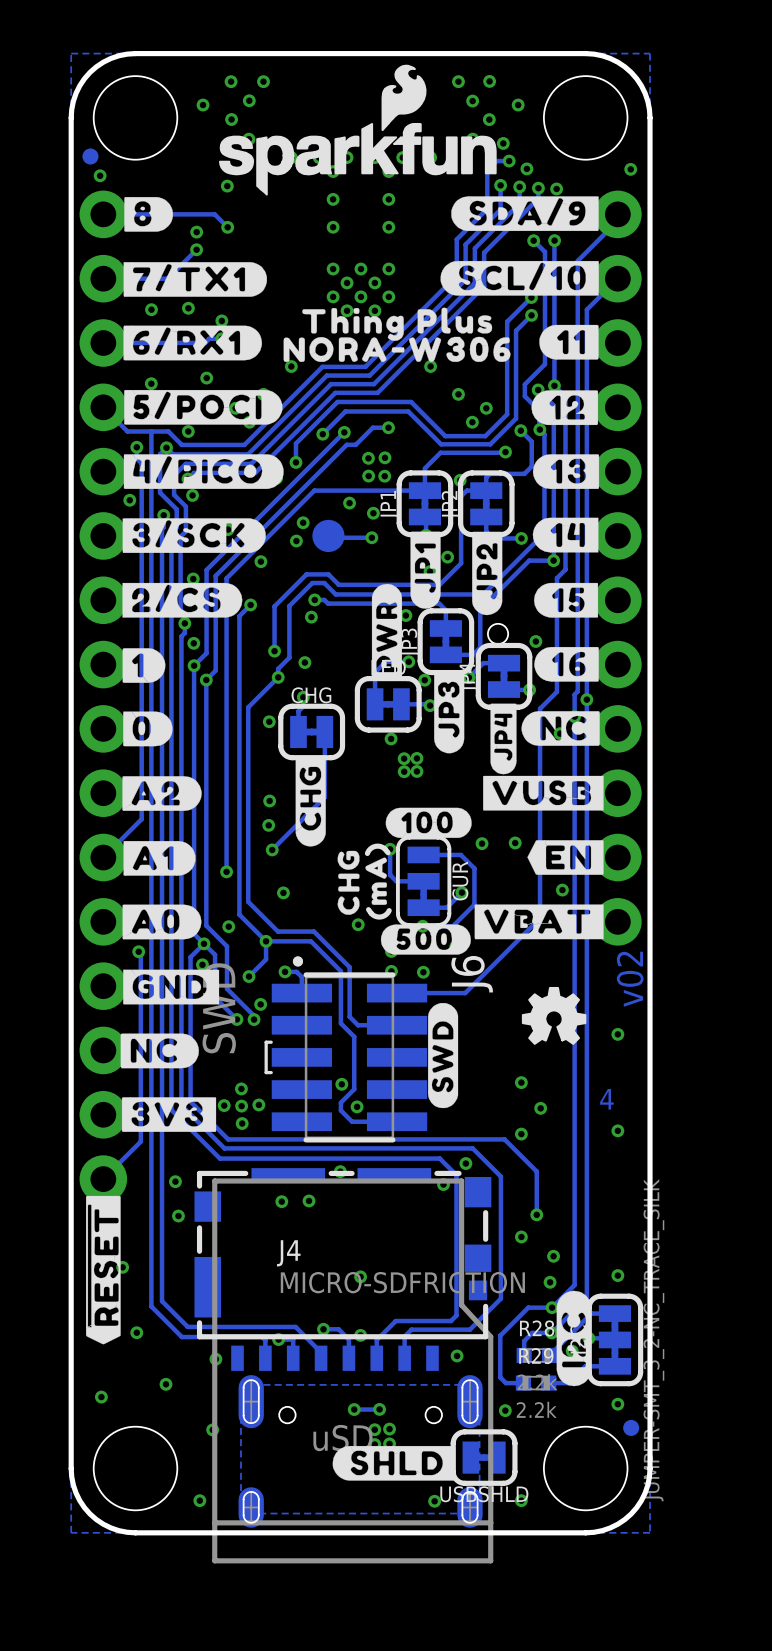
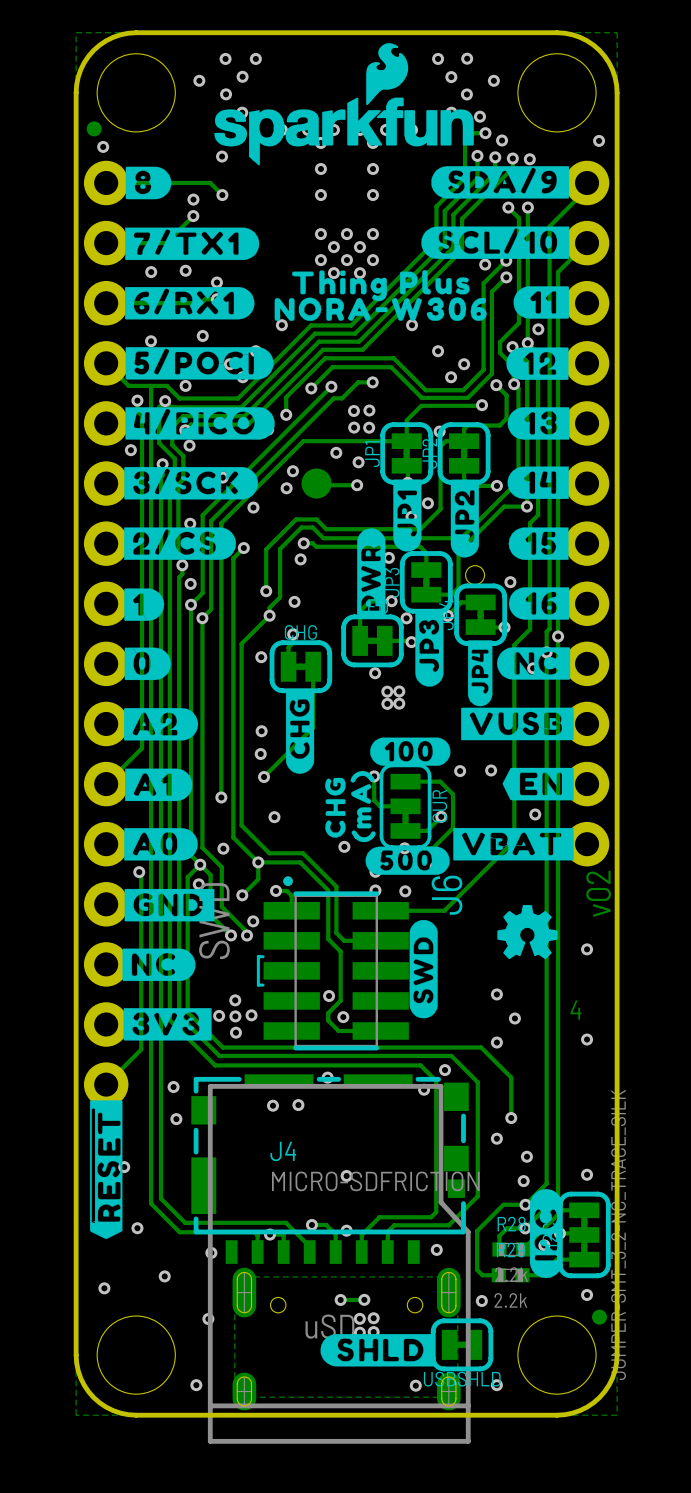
via: none -> (485, 264)
via: none -> (538, 329)

